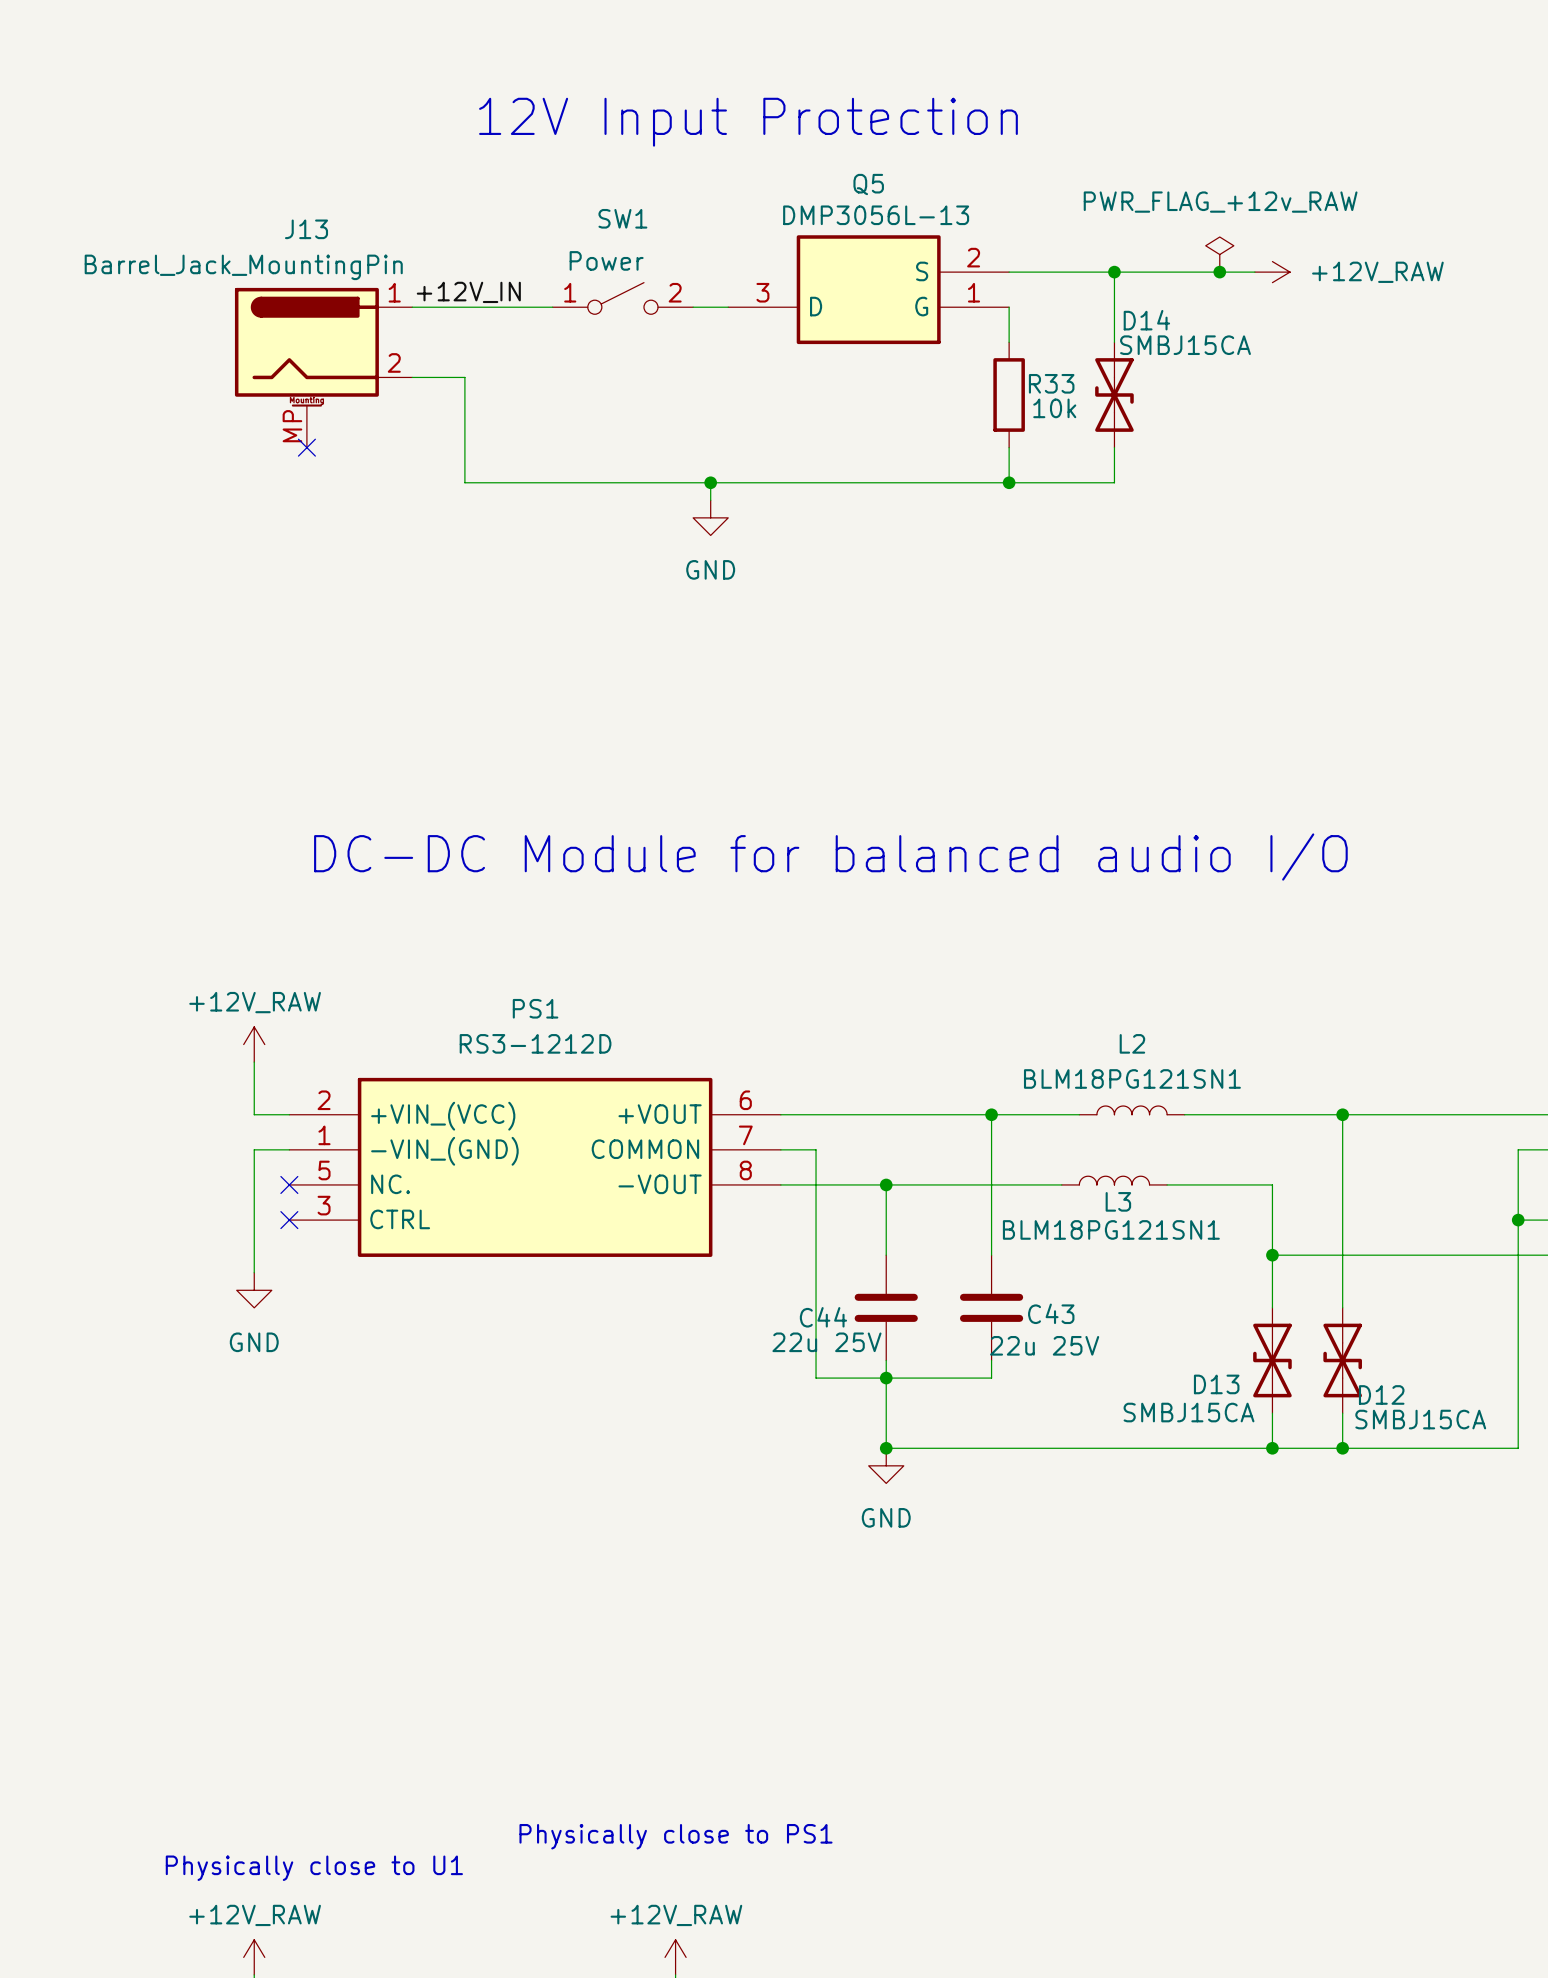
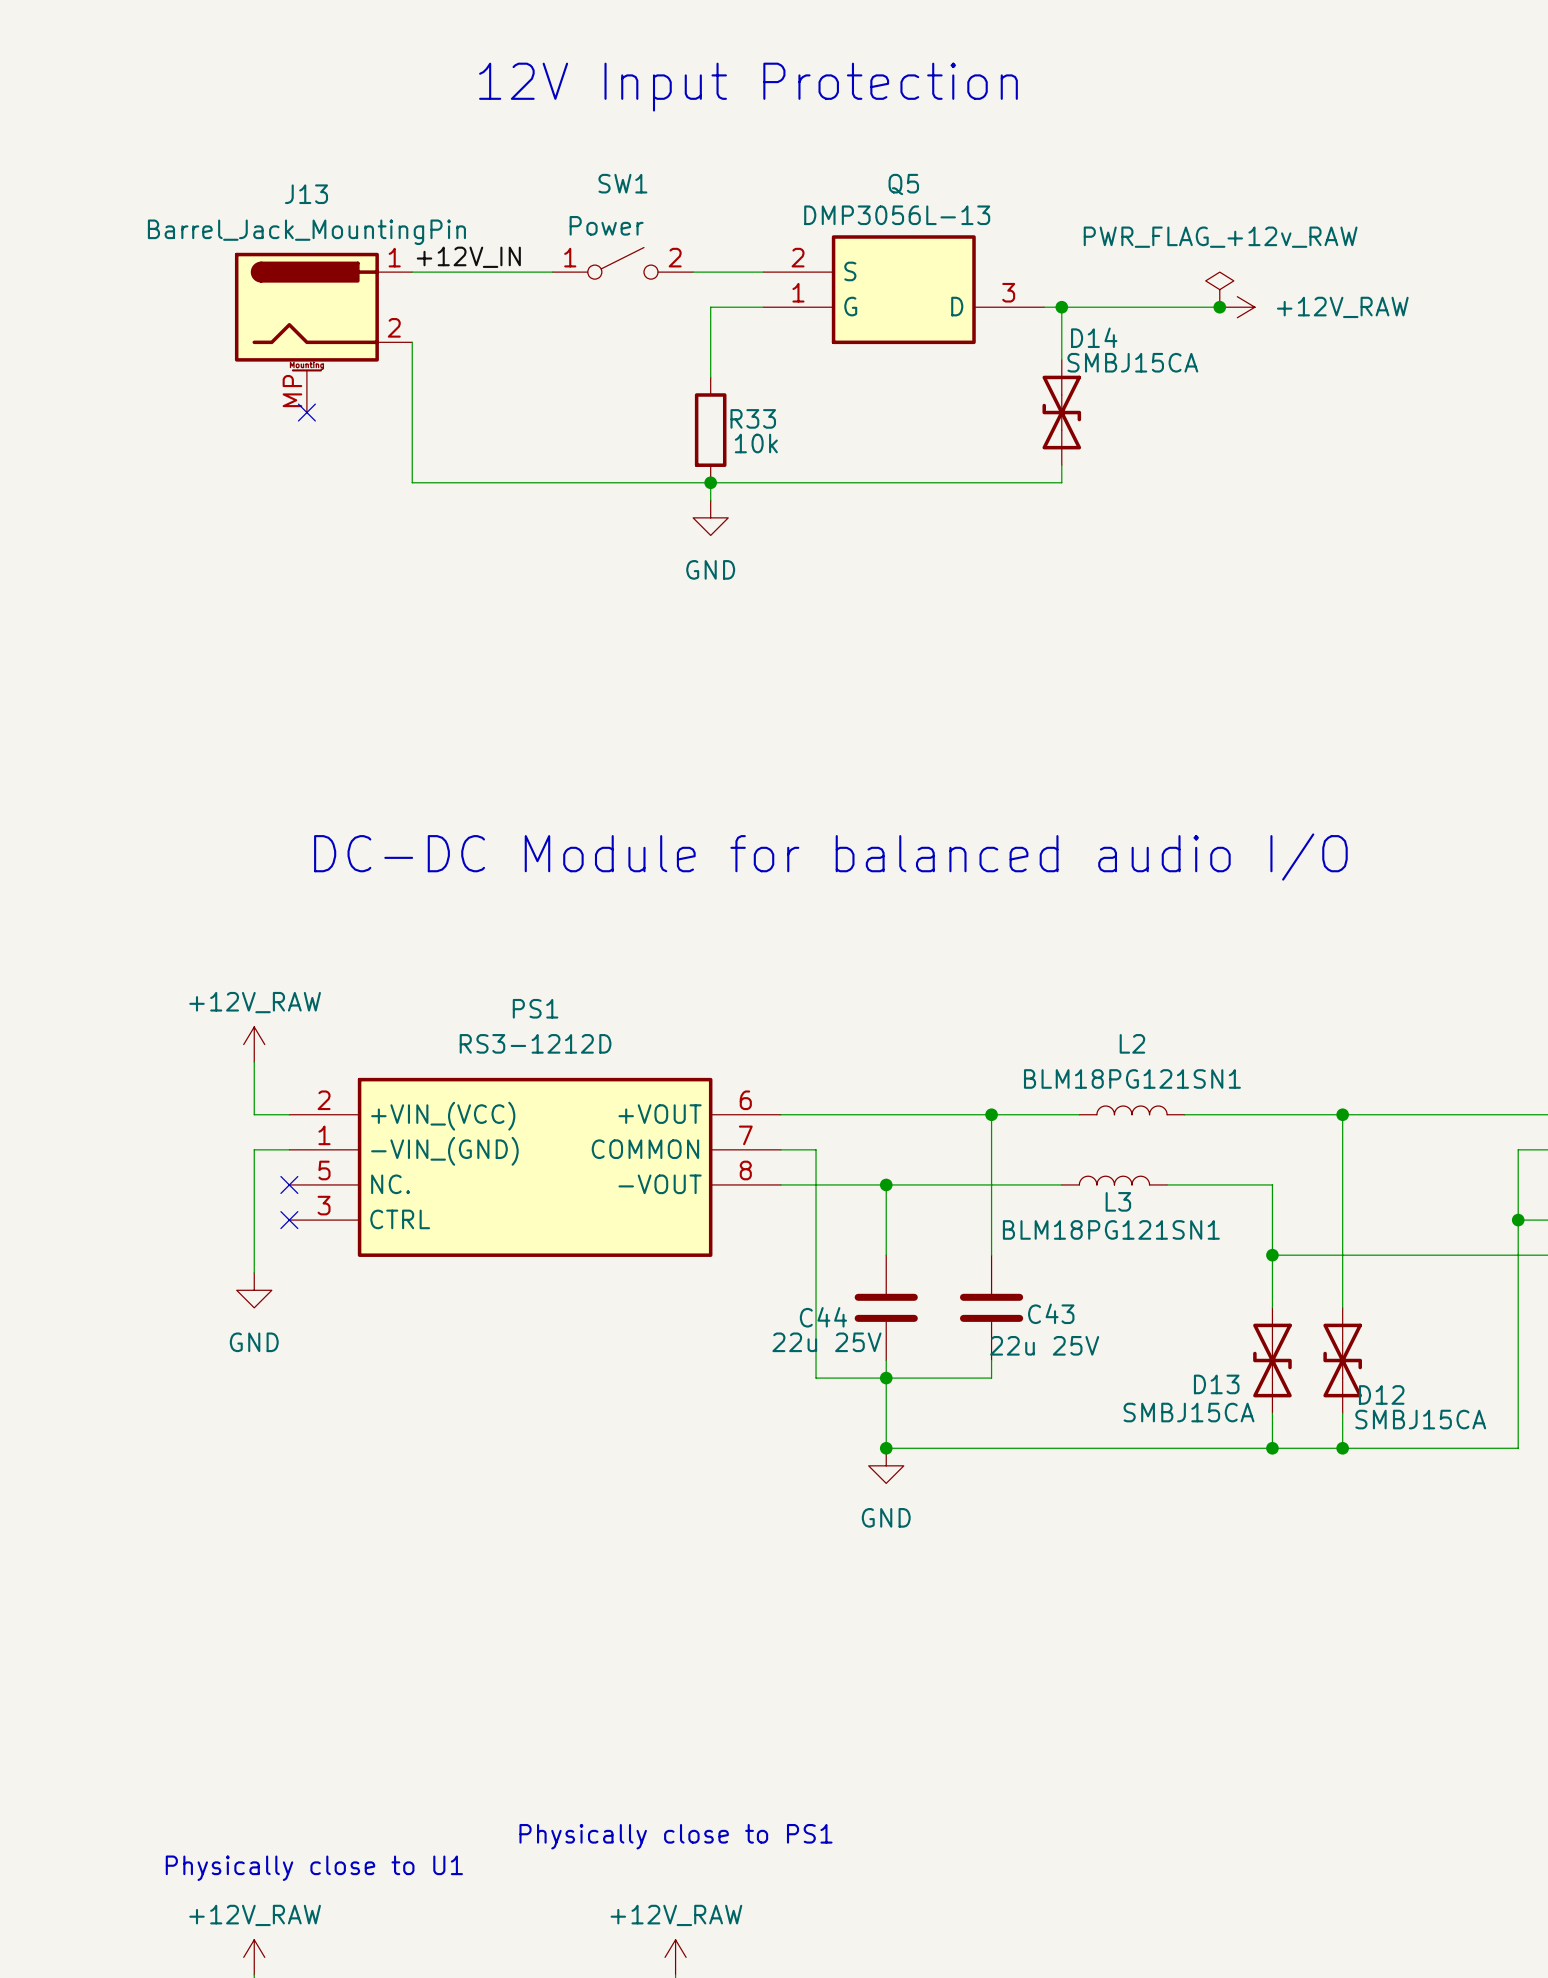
text position: 12V Input Protection (748, 122) -> 12V Input Protection (748, 87)
power symbol position: PWR_FLAG_+12v_RAW (1219, 254) -> PWR_FLAG_+12v_RAW (1219, 289)
J13 value position: Barrel_Jack_MountingPin (243, 267) -> Barrel_Jack_MountingPin (306, 232)
wire: none -> (693, 272) (763, 272)
wire: (1009, 272) (1254, 272) -> none
wire: (1114, 272) (1114, 342) -> none
junction: (1114, 272) -> none
junction position: (1219, 272) -> (1219, 307)
power symbol position: +12V_RAW (1272, 272) -> +12V_RAW (1237, 307)
Q5 flip: as is (868, 289) -> left-right (903, 289)
label position: +12V_IN (468, 292) -> +12V_IN (468, 257)
SW1 position: (622, 298) -> (622, 263)
wire: (412, 307) (552, 307) -> (412, 272) (552, 272)
wire: (693, 307) (710, 307) -> (710, 377) (710, 307)
wire: (1009, 307) (1009, 342) -> none
wire: none -> (1044, 307) (1219, 307)
wire: none -> (1061, 307) (1061, 359)
junction: none -> (1061, 307)
J13 position: (323, 367) -> (323, 332)
wire: (412, 377) (464, 377) (464, 482) -> (412, 342) (412, 482) (464, 482)
R33 position: (1009, 394) -> (710, 430)
D14 position: (1114, 394) -> (1061, 412)
no-connect mark position: (306, 447) -> (306, 412)
wire: (1009, 447) (1009, 482) -> none
wire: (1114, 447) (1114, 482) (1061, 482) -> (1061, 465) (1061, 482)
junction: (1009, 482) -> none

